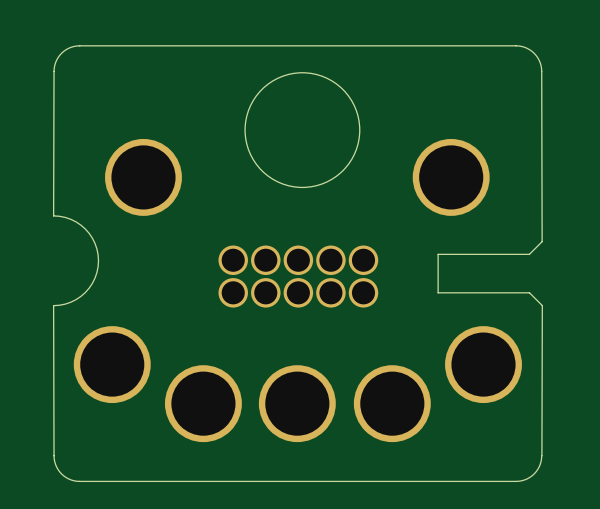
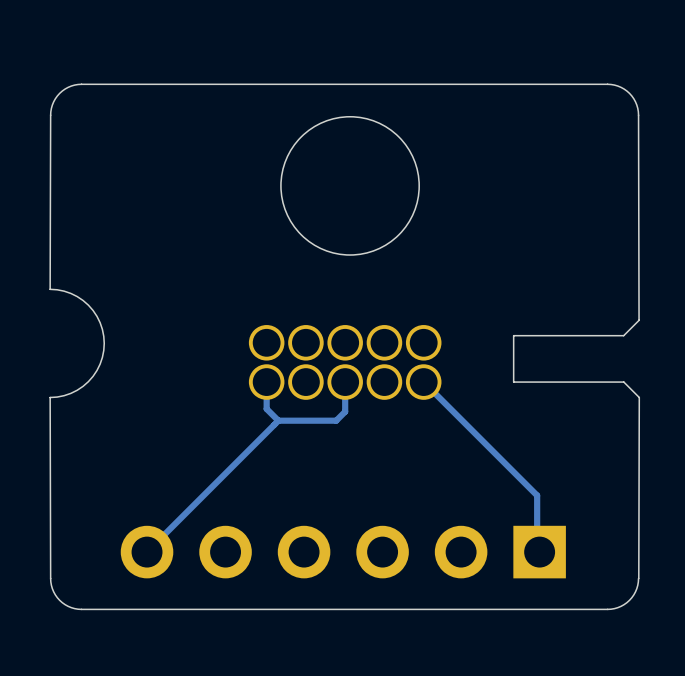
part: (143, 177) -> none
part: (451, 177) -> none
track: none -> (266, 382) (266, 408) (278, 420)
track: none -> (345, 382) (345, 411) (336, 420) (278, 420)
track: none -> (423, 382) (537, 495) (537, 549) (539, 552)
track: none -> (278, 420) (147, 552)
part: (112, 364) -> none
part: (483, 364) -> none
part: (203, 403) -> none
part: (297, 403) -> none
part: (392, 403) -> none
part: none -> (343, 552)

